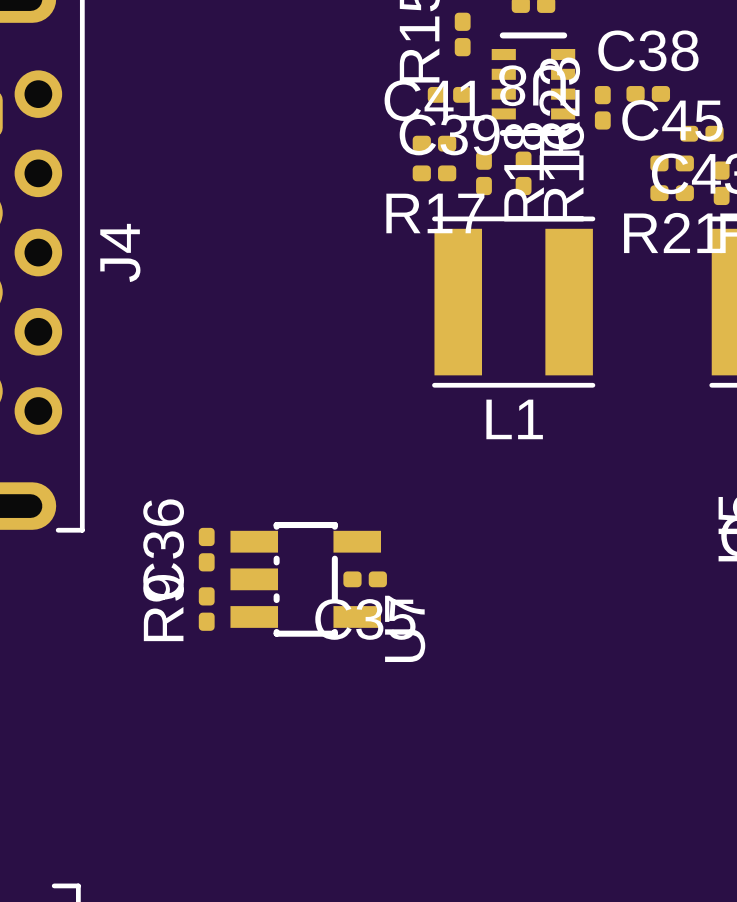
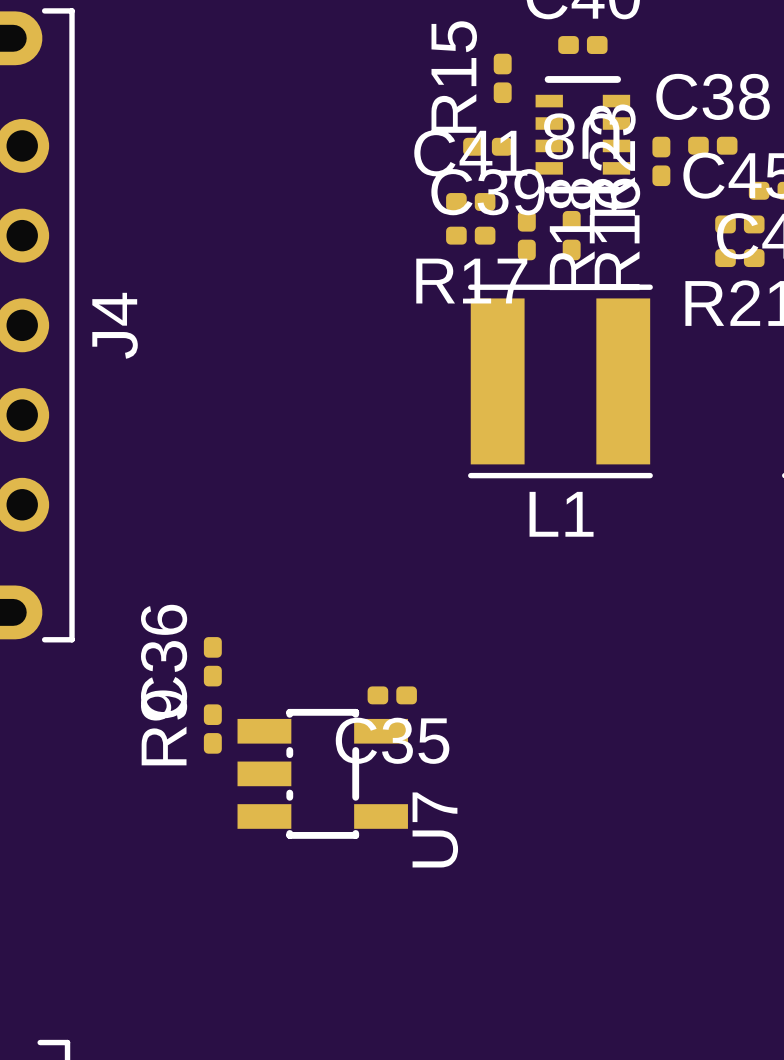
U7 position: (305, 579) -> (322, 773)

